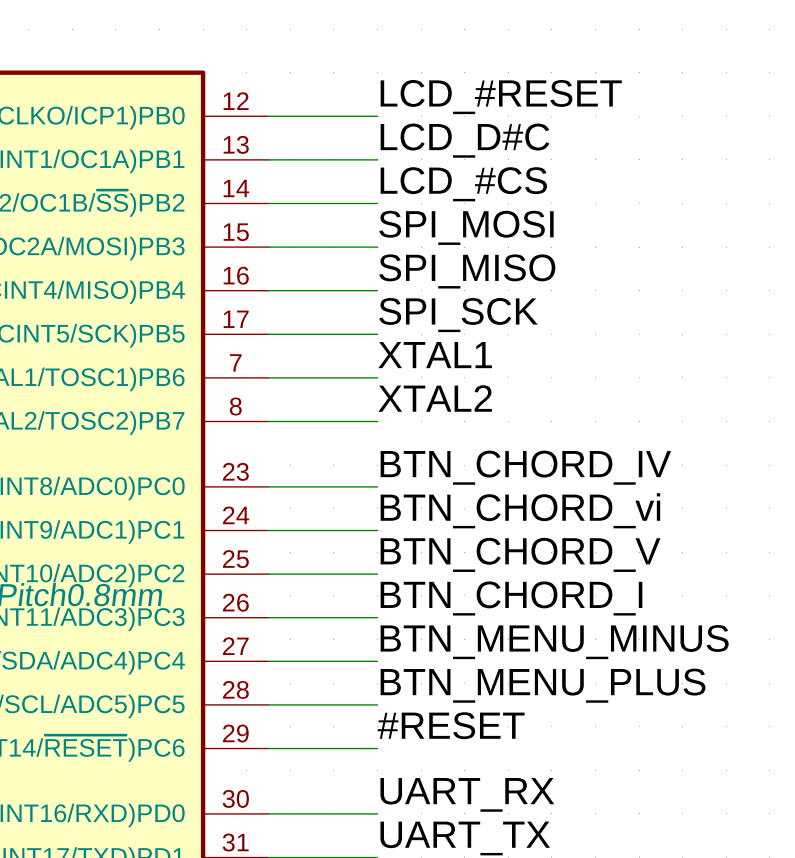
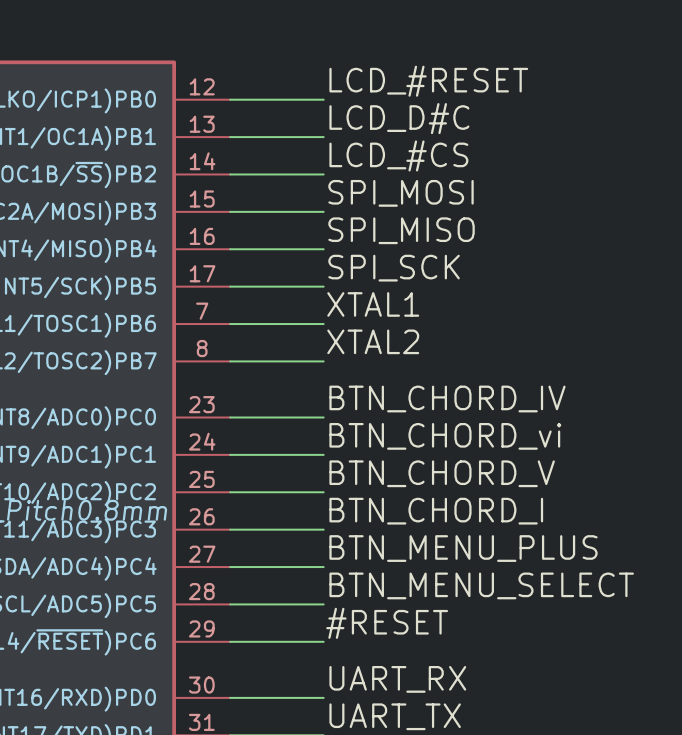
label: BTN_MENU_MINUS (554, 642) -> BTN_MENU_PLUS (463, 548)
label: BTN_MENU_PLUS (543, 685) -> BTN_MENU_SELECT (481, 585)

